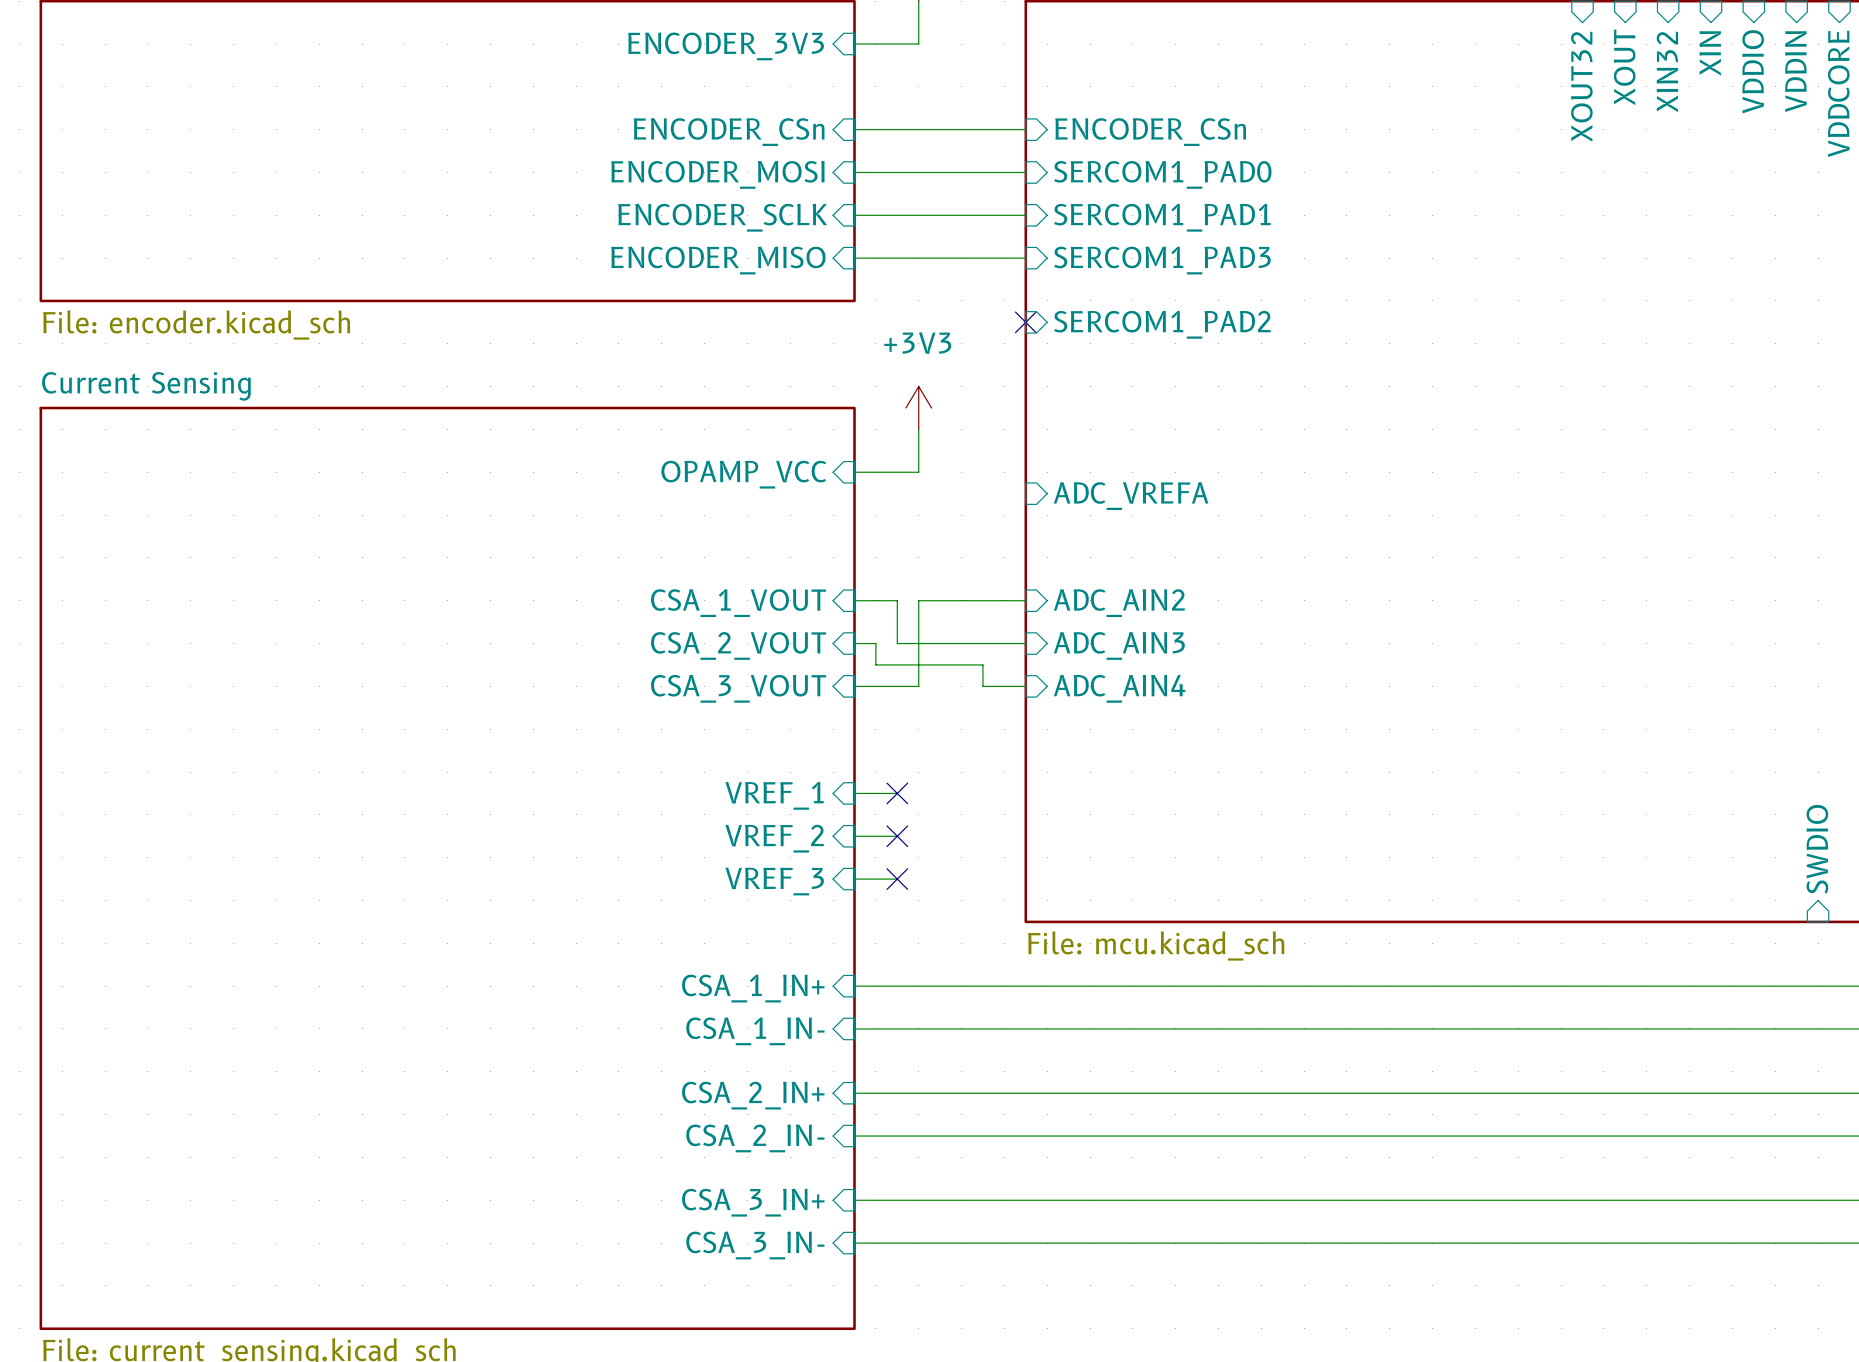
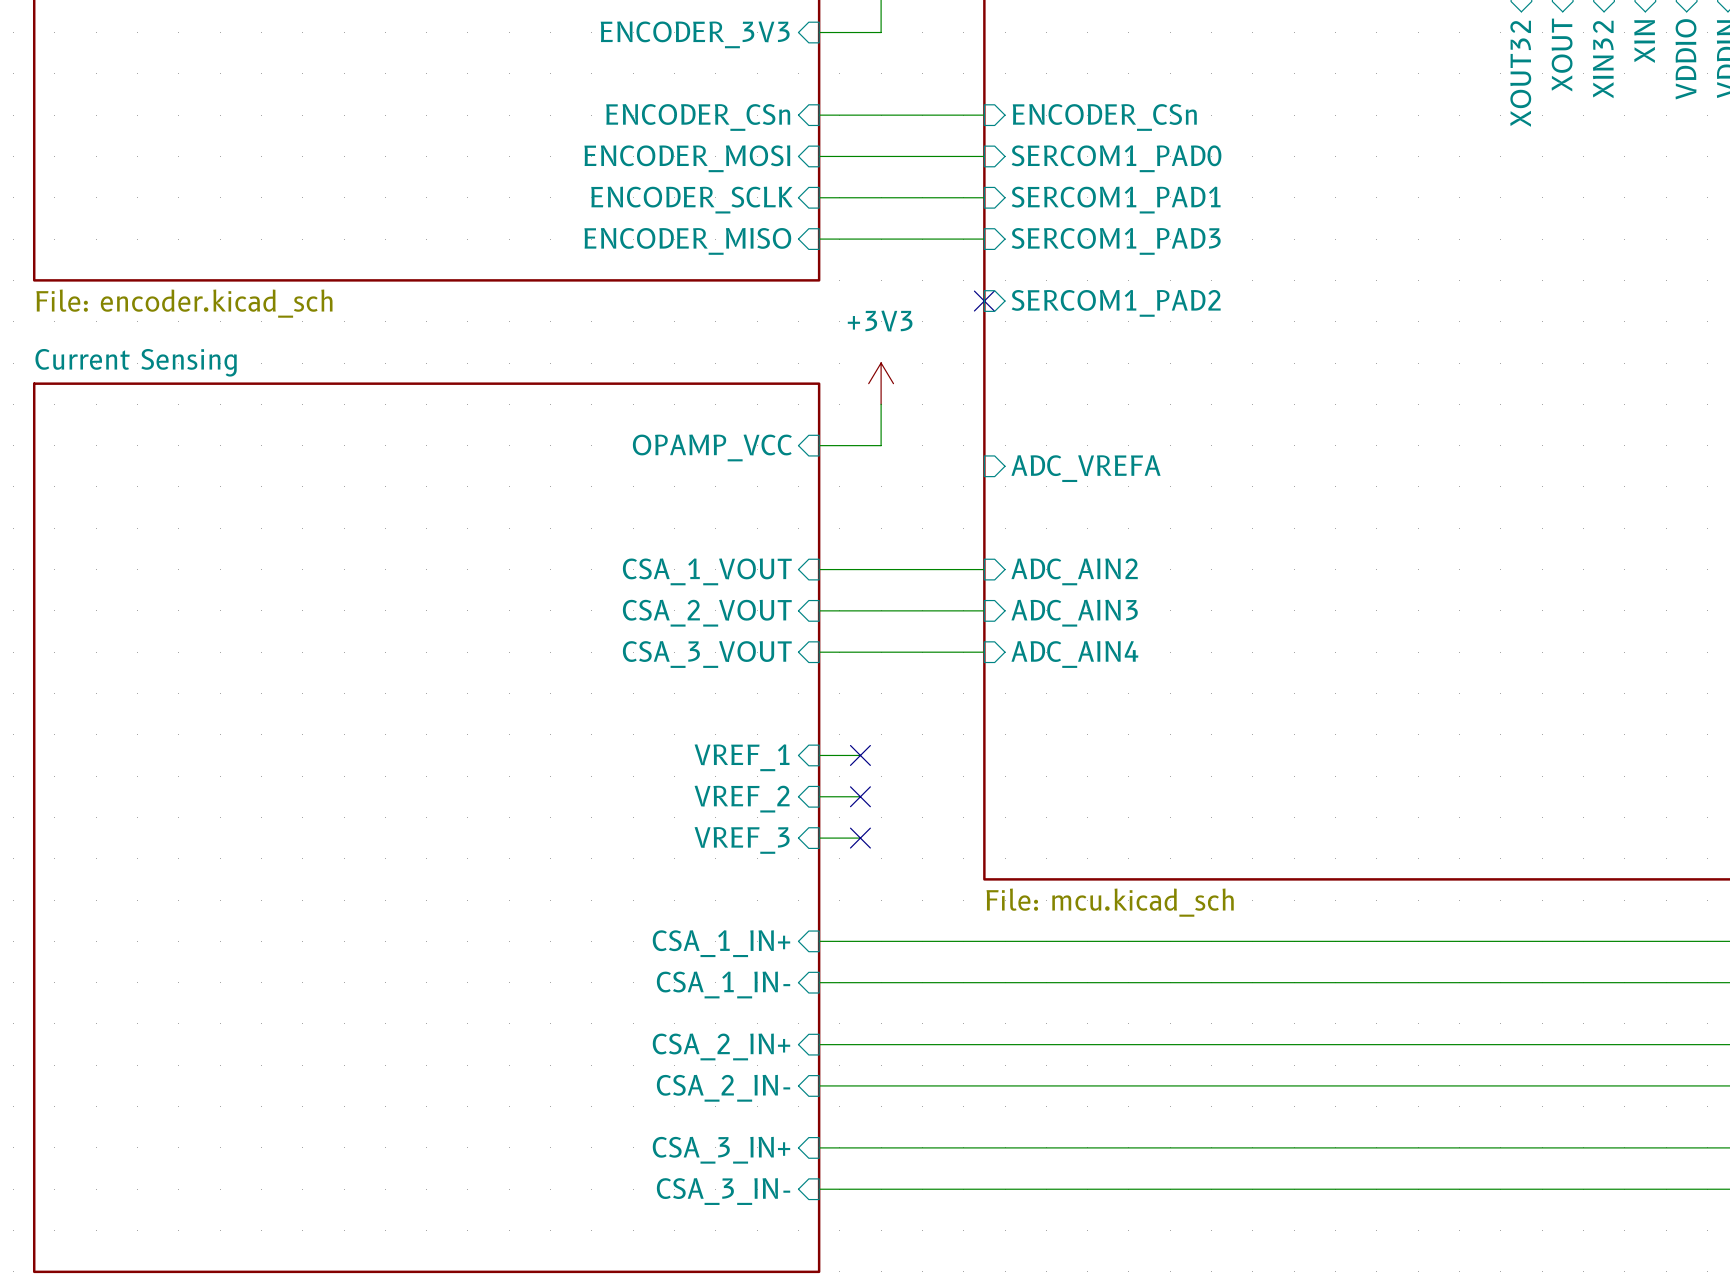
wire: (897, 600) (897, 643) -> (860, 569) (881, 569)
wire: (918, 600) (918, 686) -> none
wire: (875, 643) (875, 664) (982, 664) (982, 686) -> (881, 652) (943, 652)
wire: none -> (839, 610) (860, 610)

